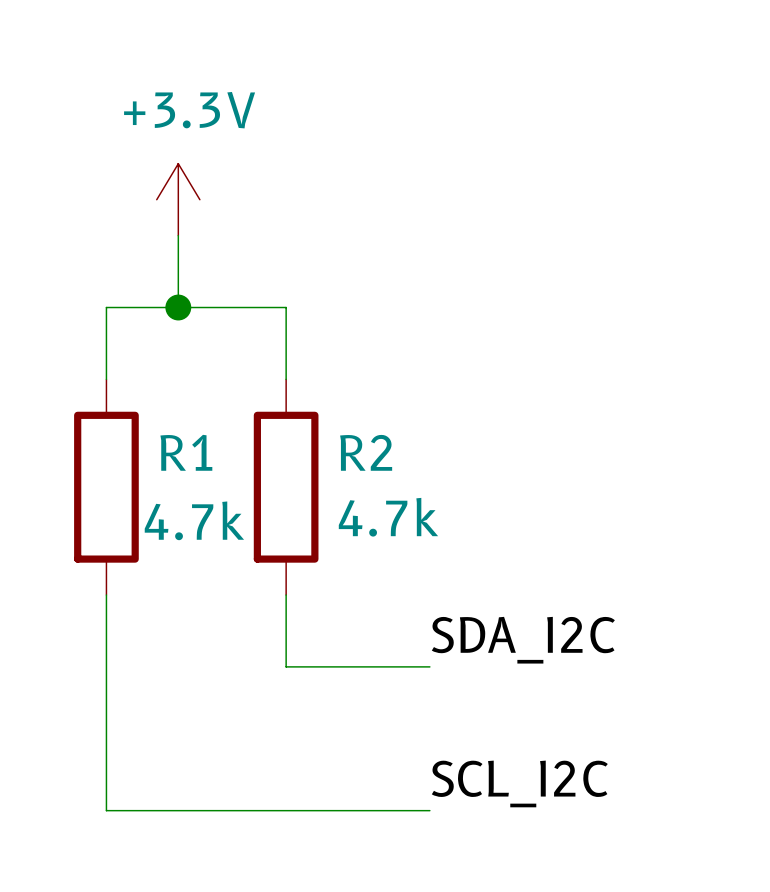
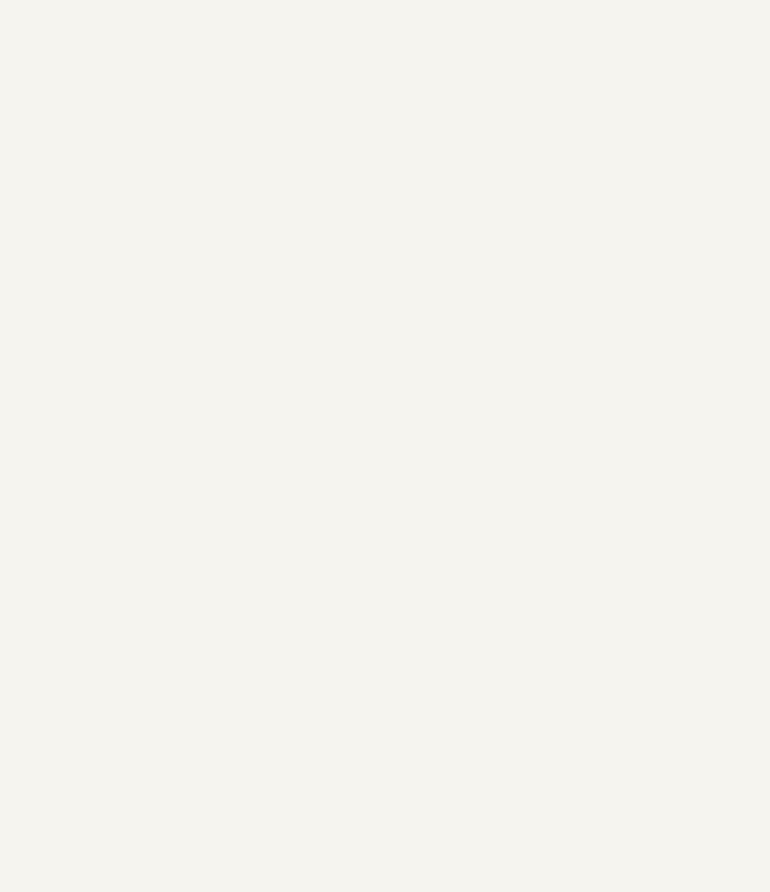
power symbol: +3.3V (178, 199) -> none
wire: (178, 235) (178, 307) -> none
junction: (178, 307) -> none
wire: (106, 379) (106, 307) (286, 307) (286, 379) -> none
R1: 4.7k (106, 487) -> none
R2: 4.7k (286, 487) -> none
wire: (106, 595) (106, 810) (429, 810) -> none
wire: (286, 595) (286, 666) (429, 666) -> none
label: SDA_I2C (523, 640) -> none
label: SCL_I2C (519, 783) -> none

